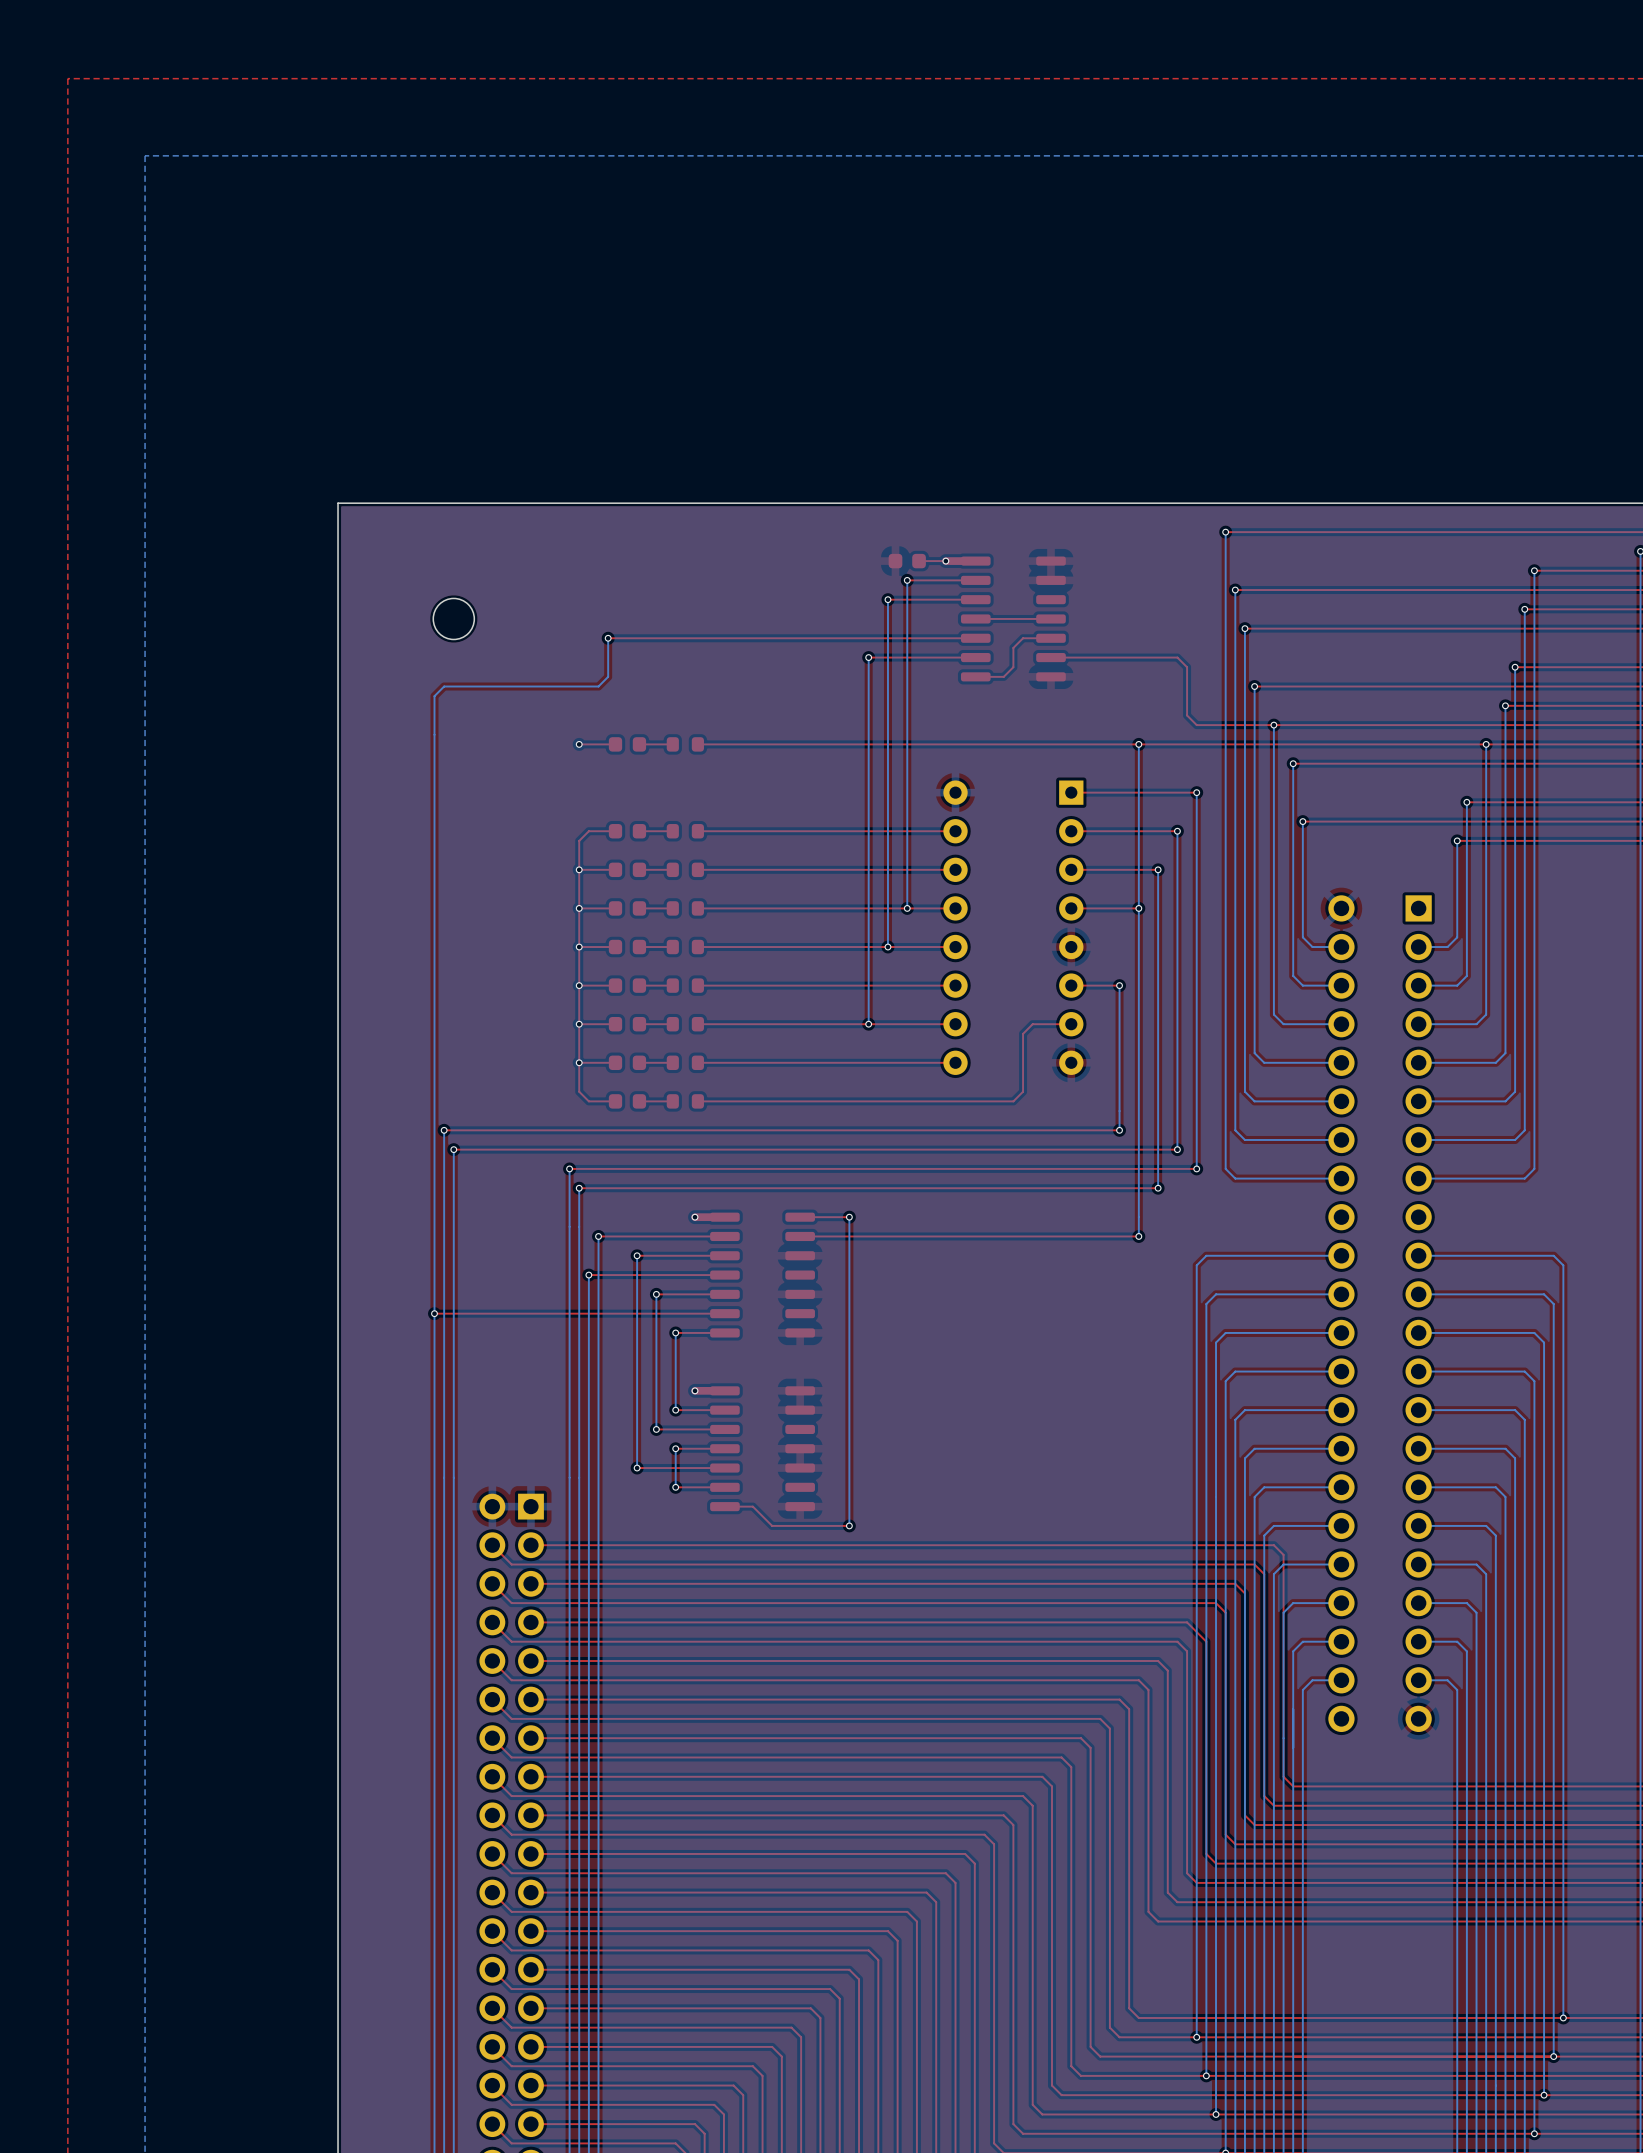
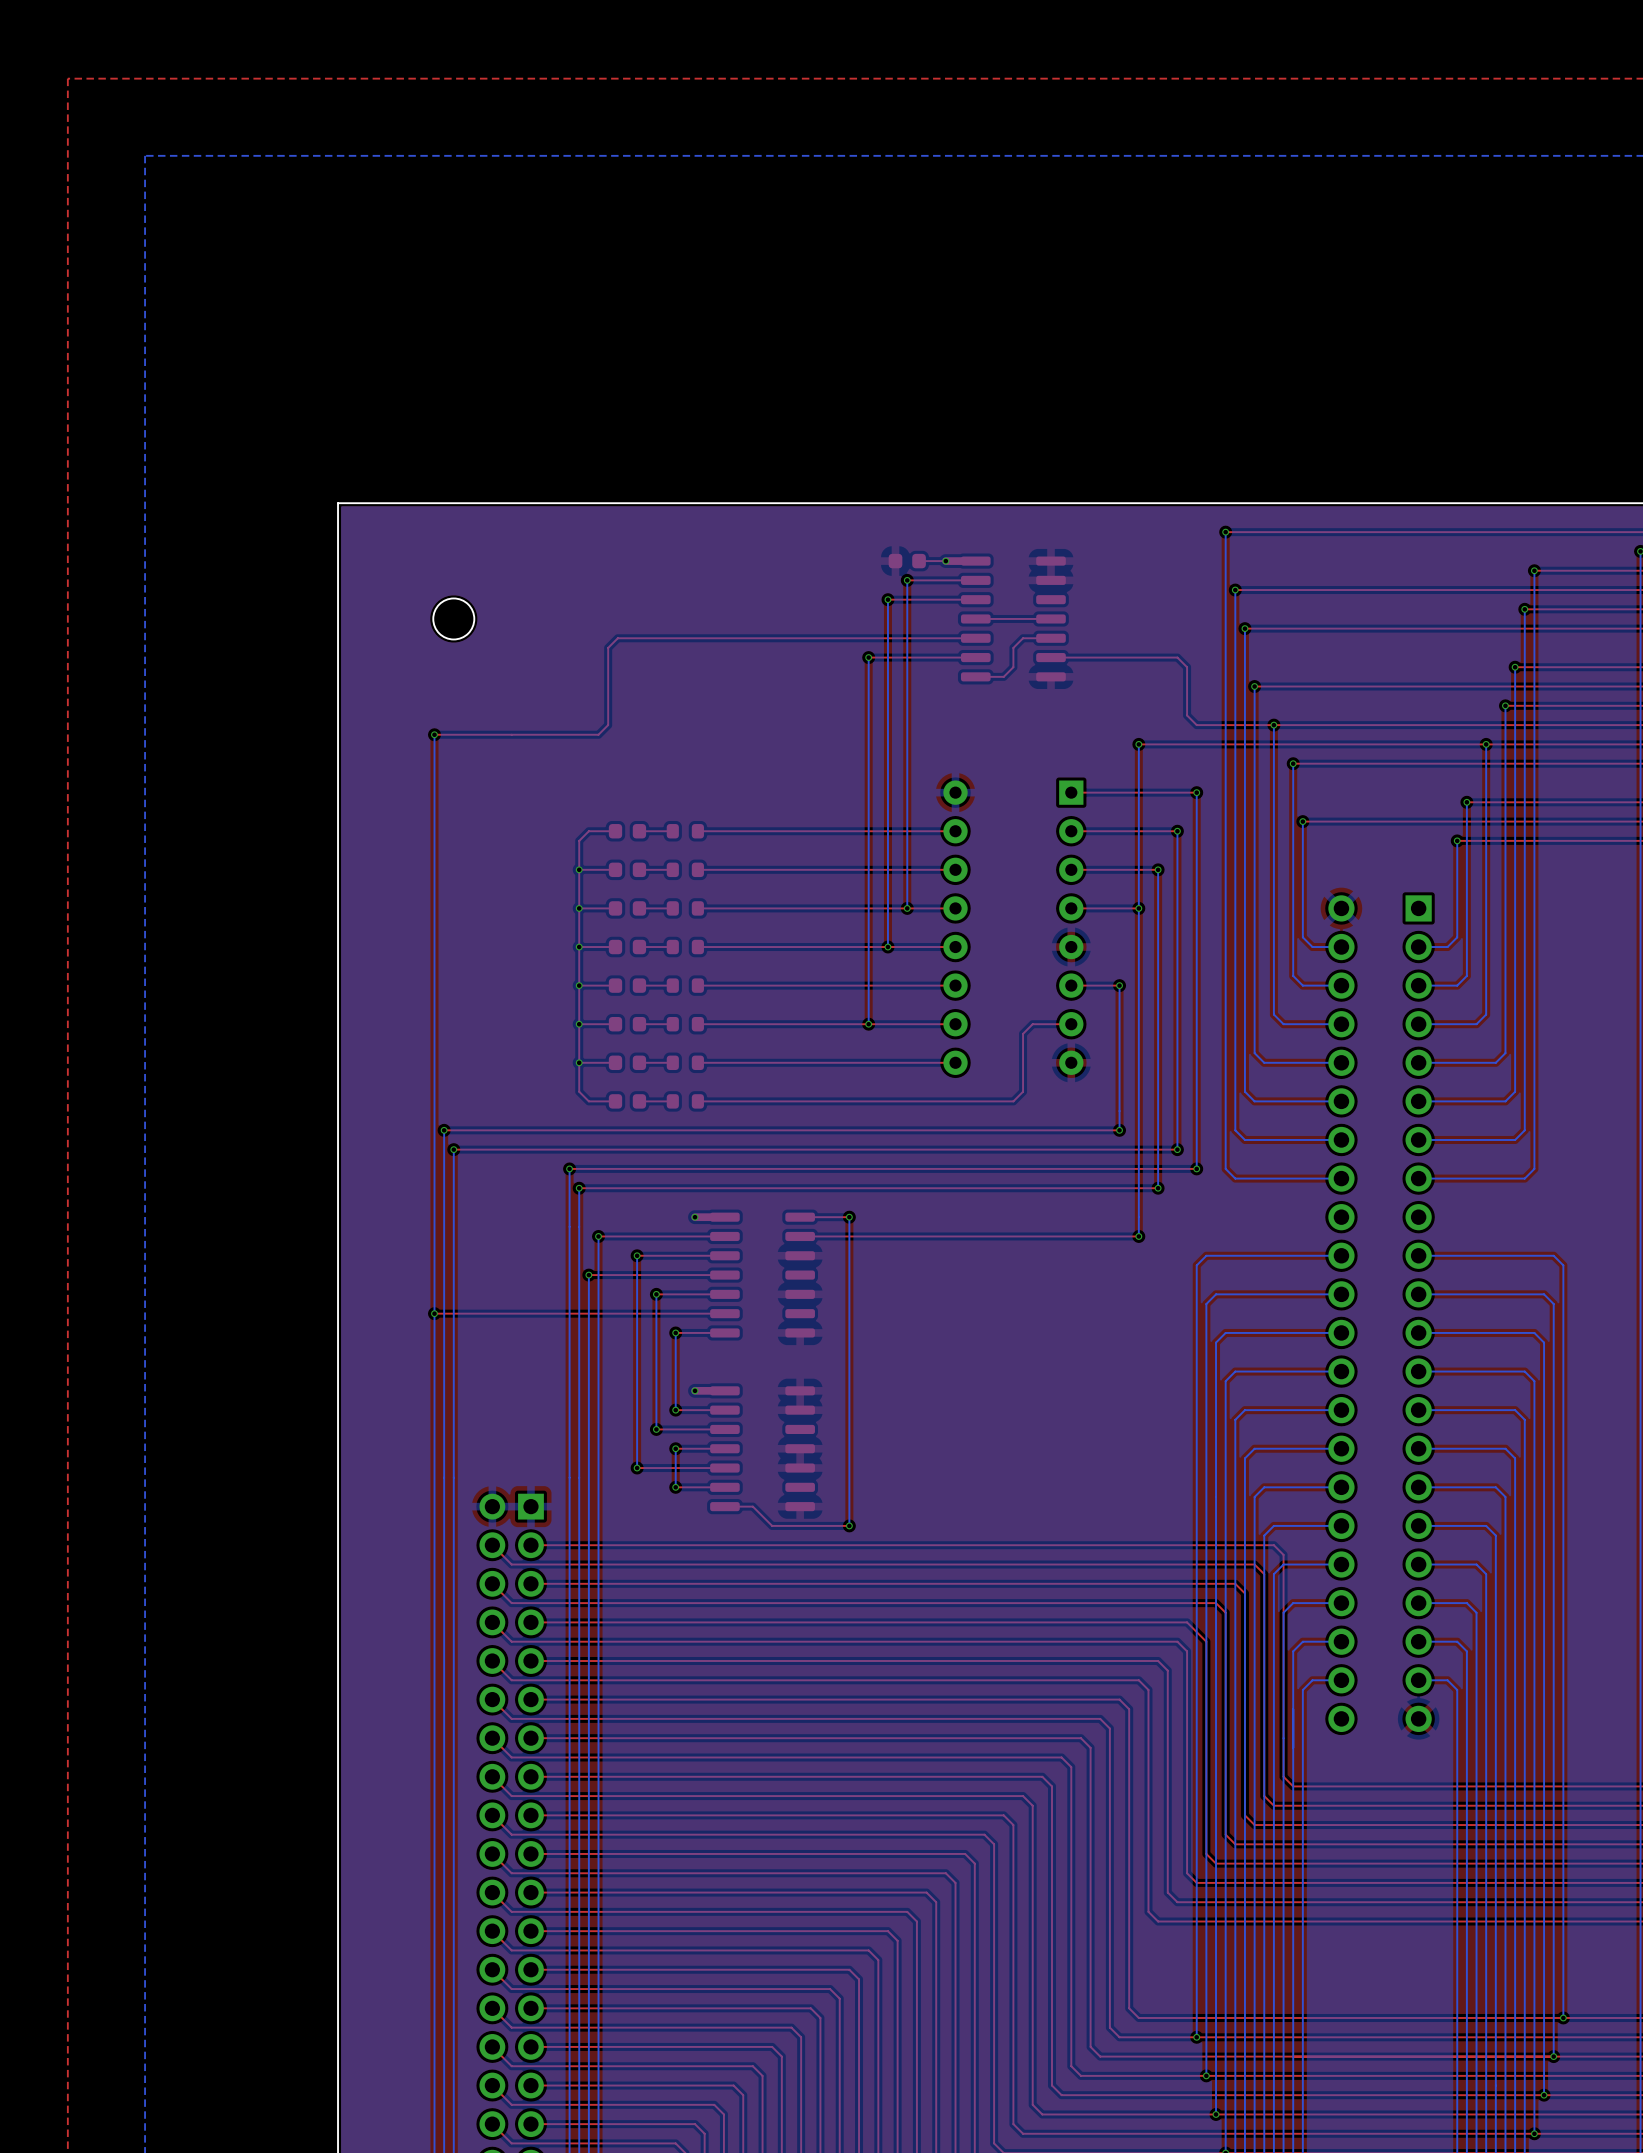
bottom track: (608, 638) (608, 676) (598, 686) (444, 686) (434, 696) (434, 734) -> none
via: (608, 638) -> none
top track: (617, 638) (608, 638) -> (617, 638) (608, 647) (608, 725) (598, 734) (434, 734)
via: none -> (434, 734)
via: (579, 744) -> none
top track: (615, 744) (579, 744) -> none
part: (627, 744) -> none
top track: (672, 744) (639, 744) -> none
part: (685, 744) -> none
top track: (1138, 744) (697, 744) -> none

